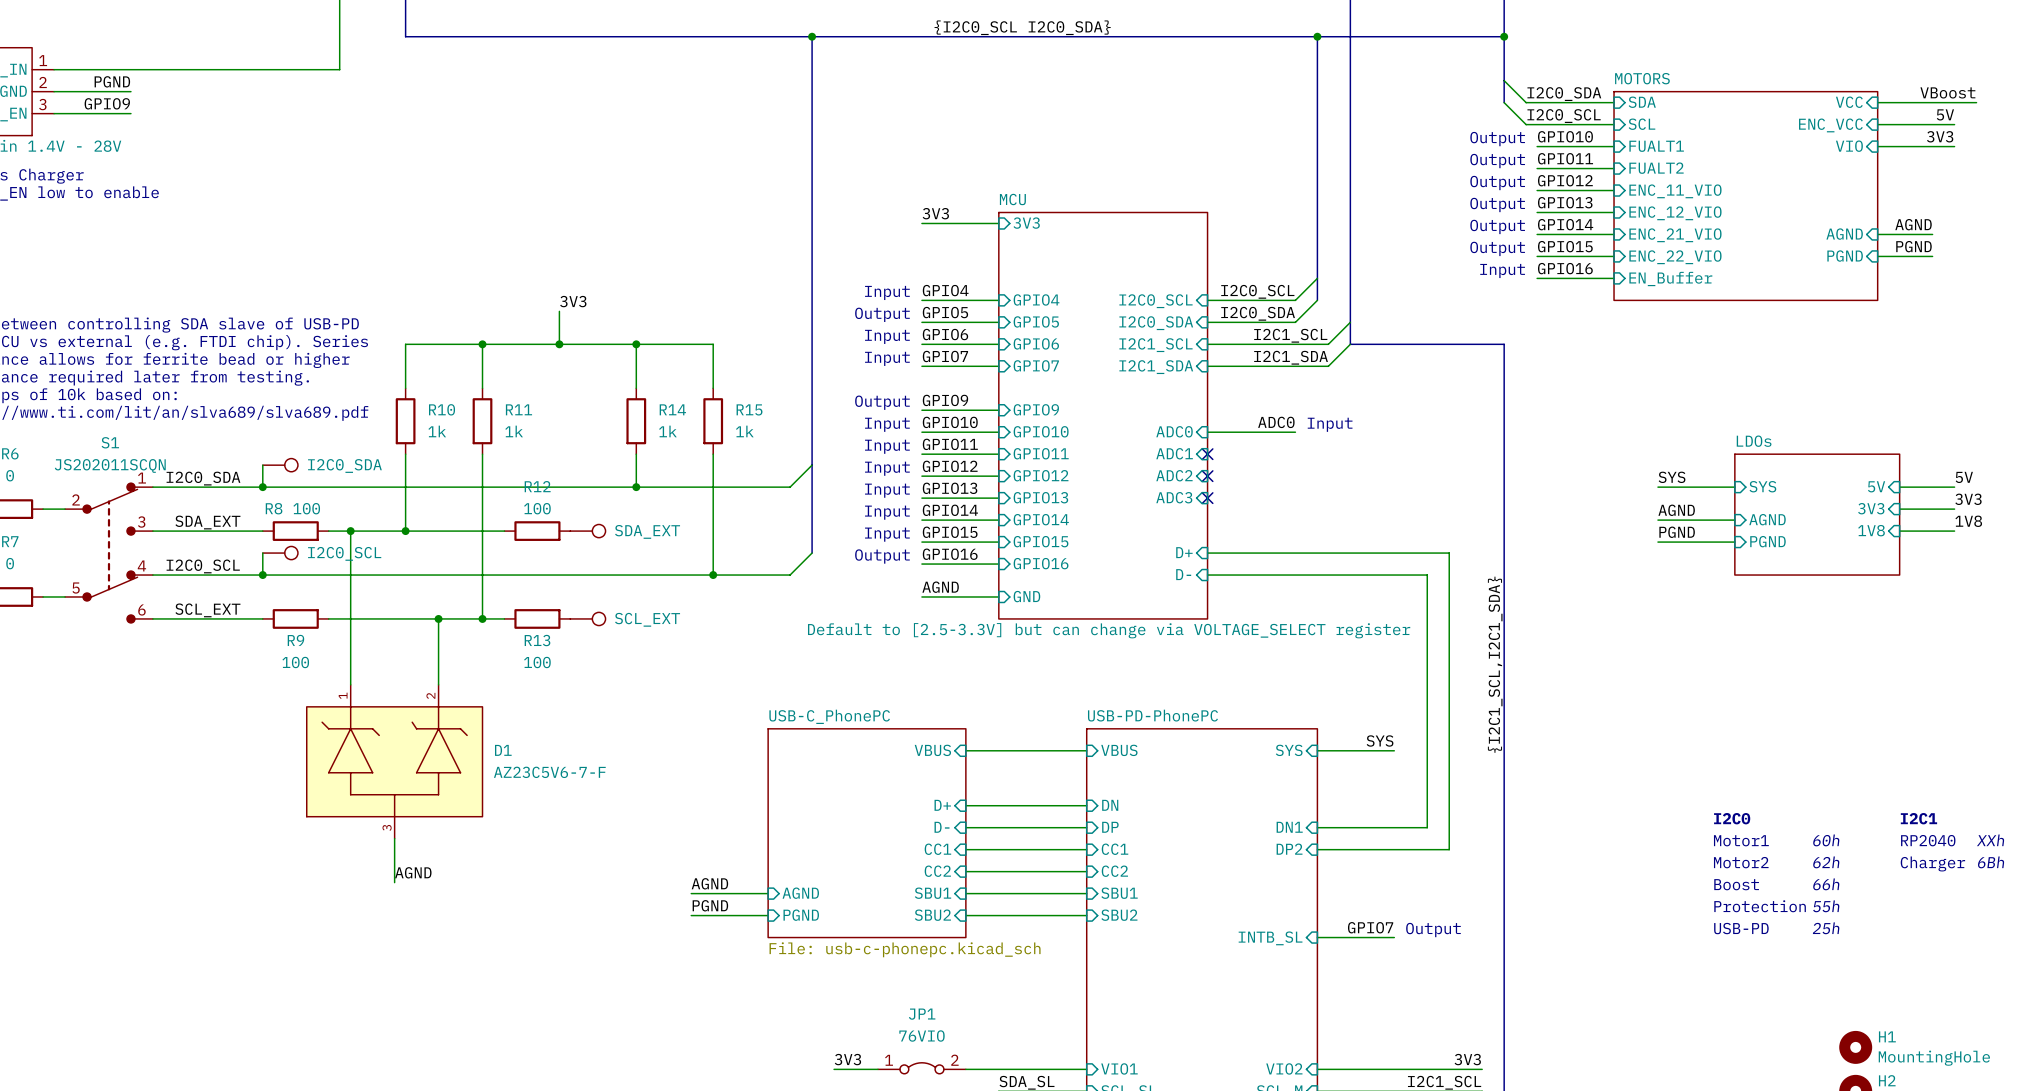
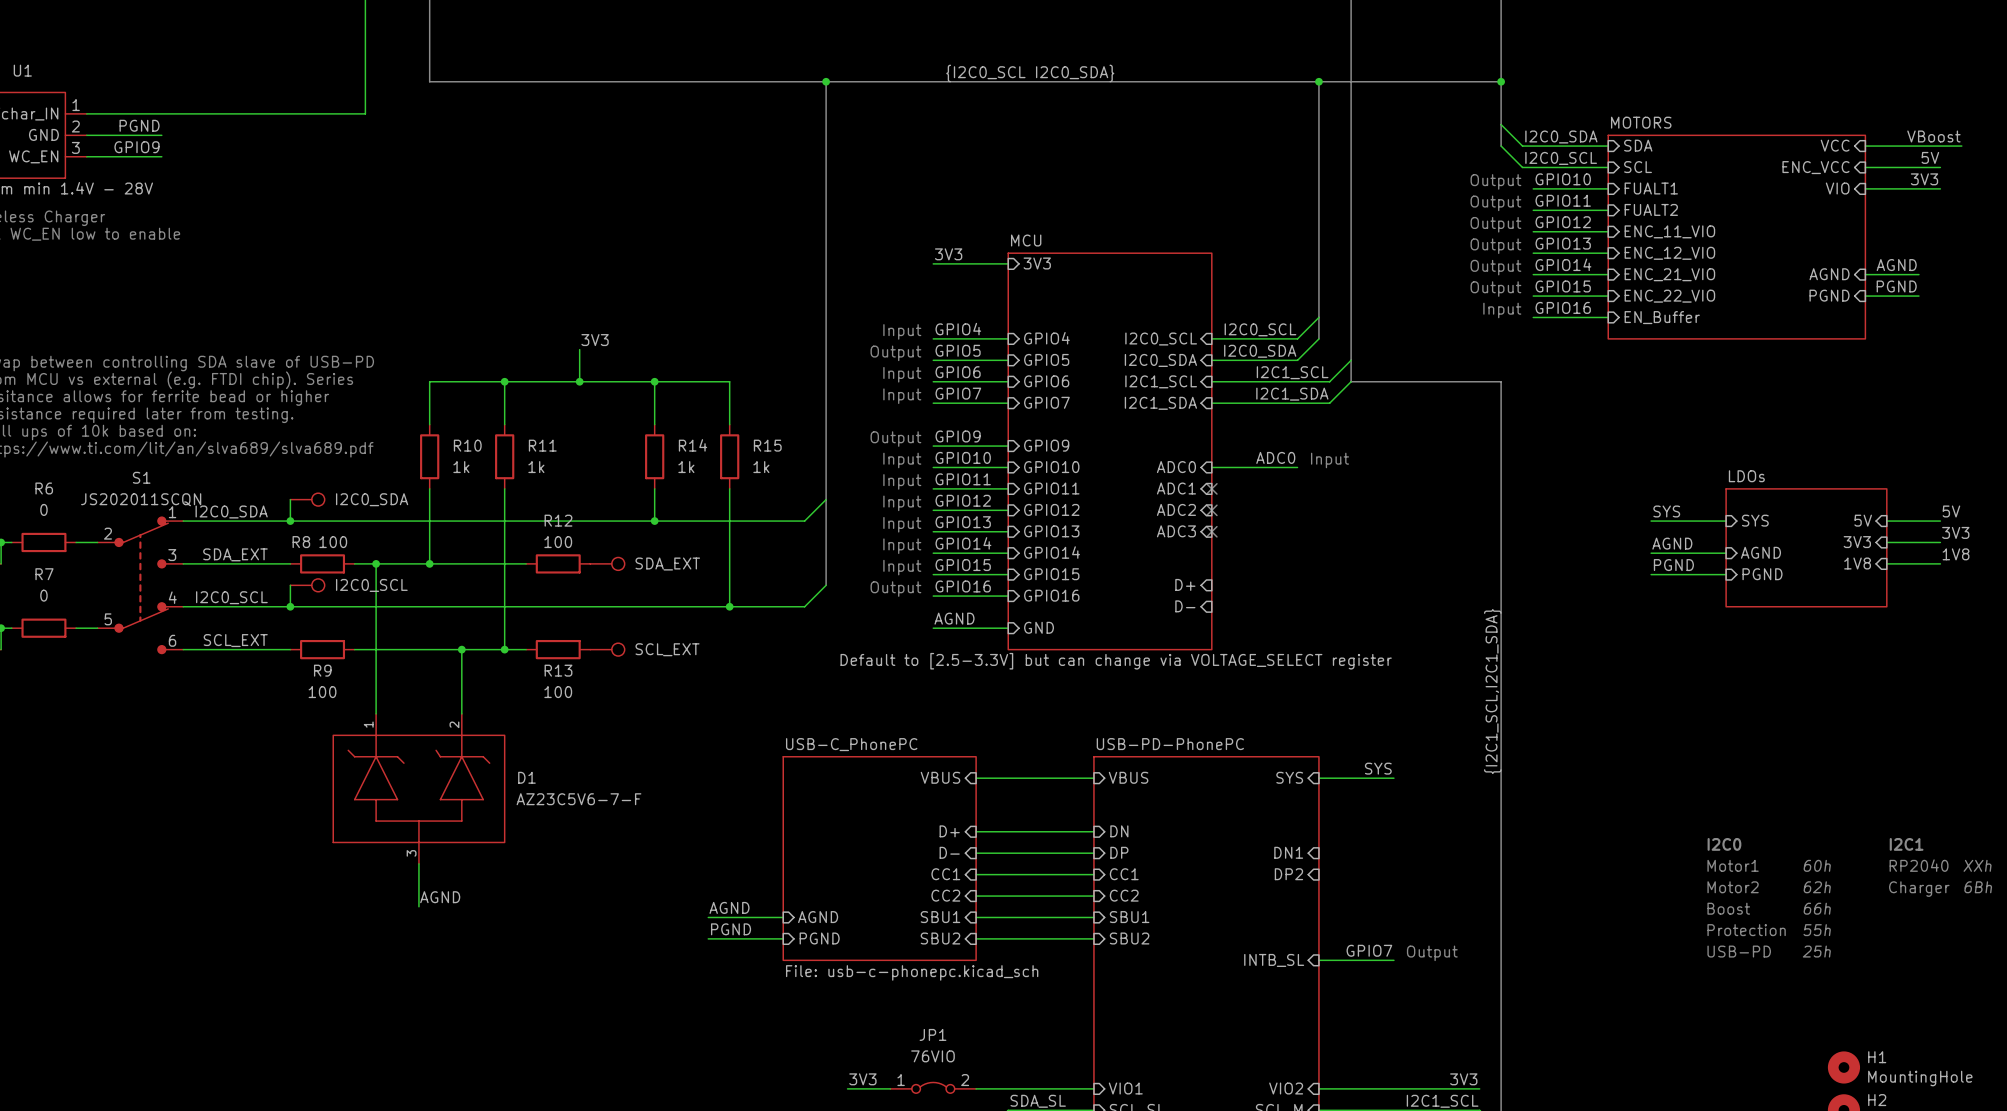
wire: (1207, 553) (1449, 553) (1449, 849) (1317, 849) -> none
wire: (1207, 575) (1427, 575) (1427, 827) (1317, 827) -> none

